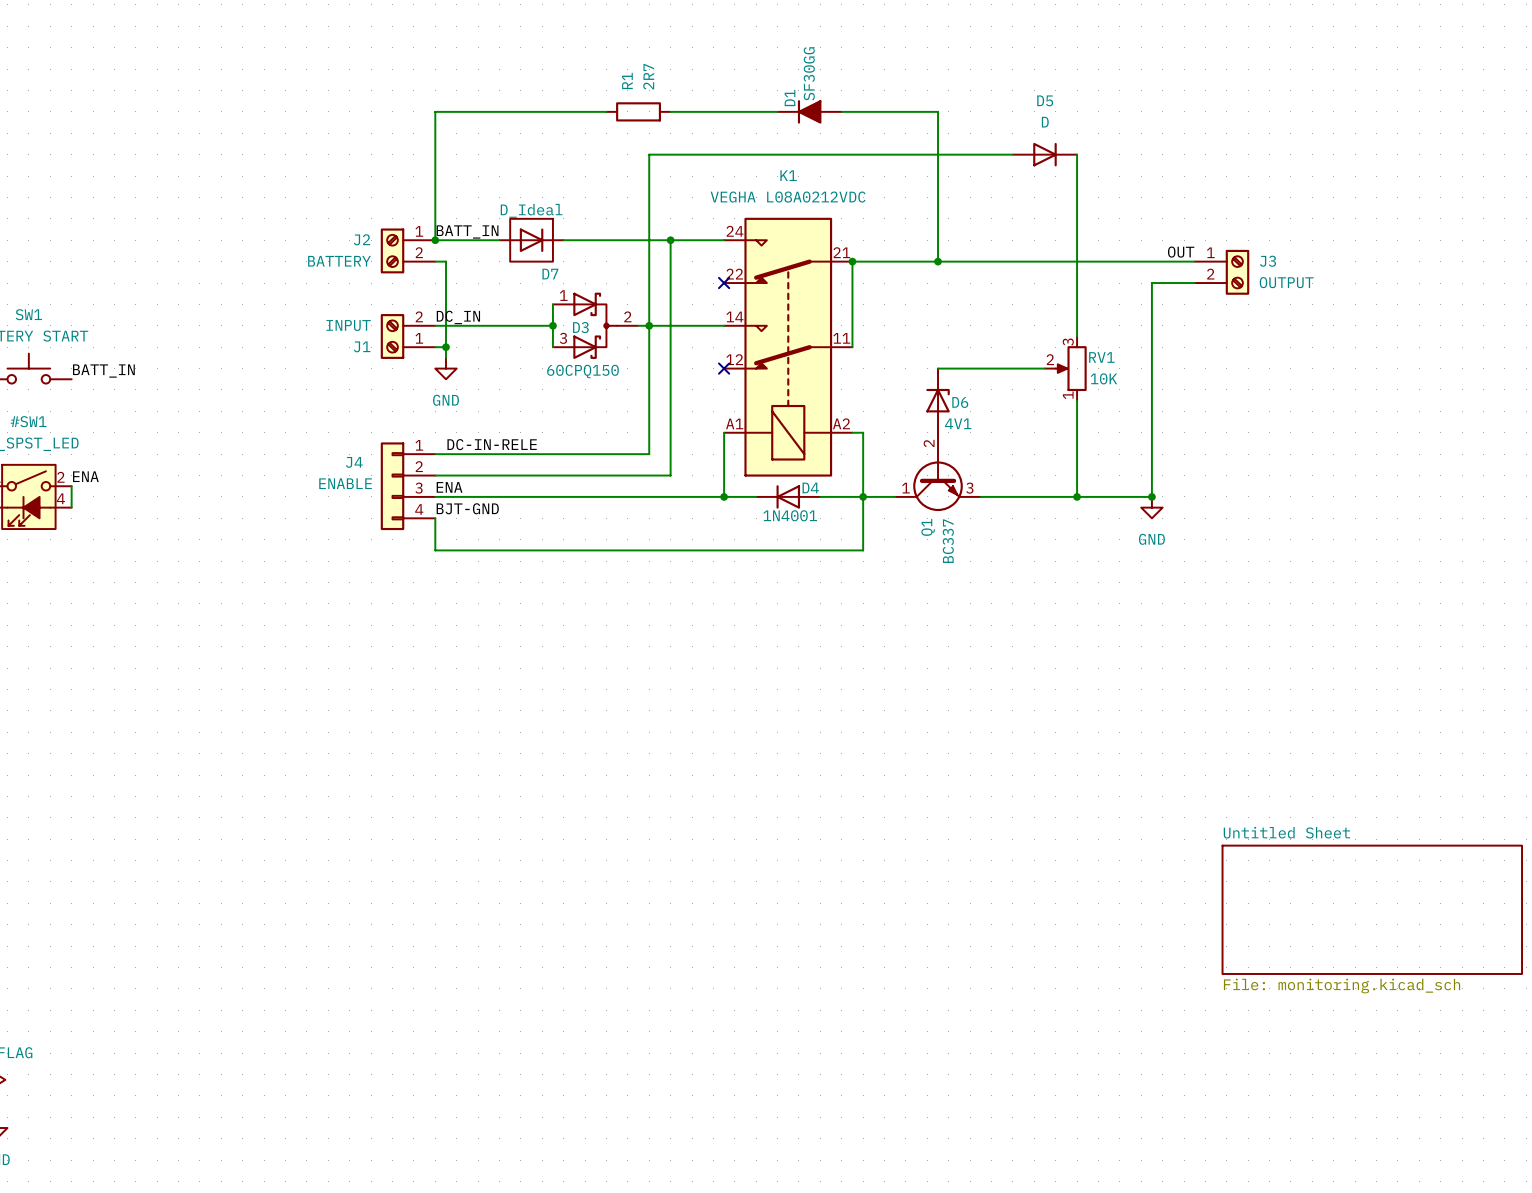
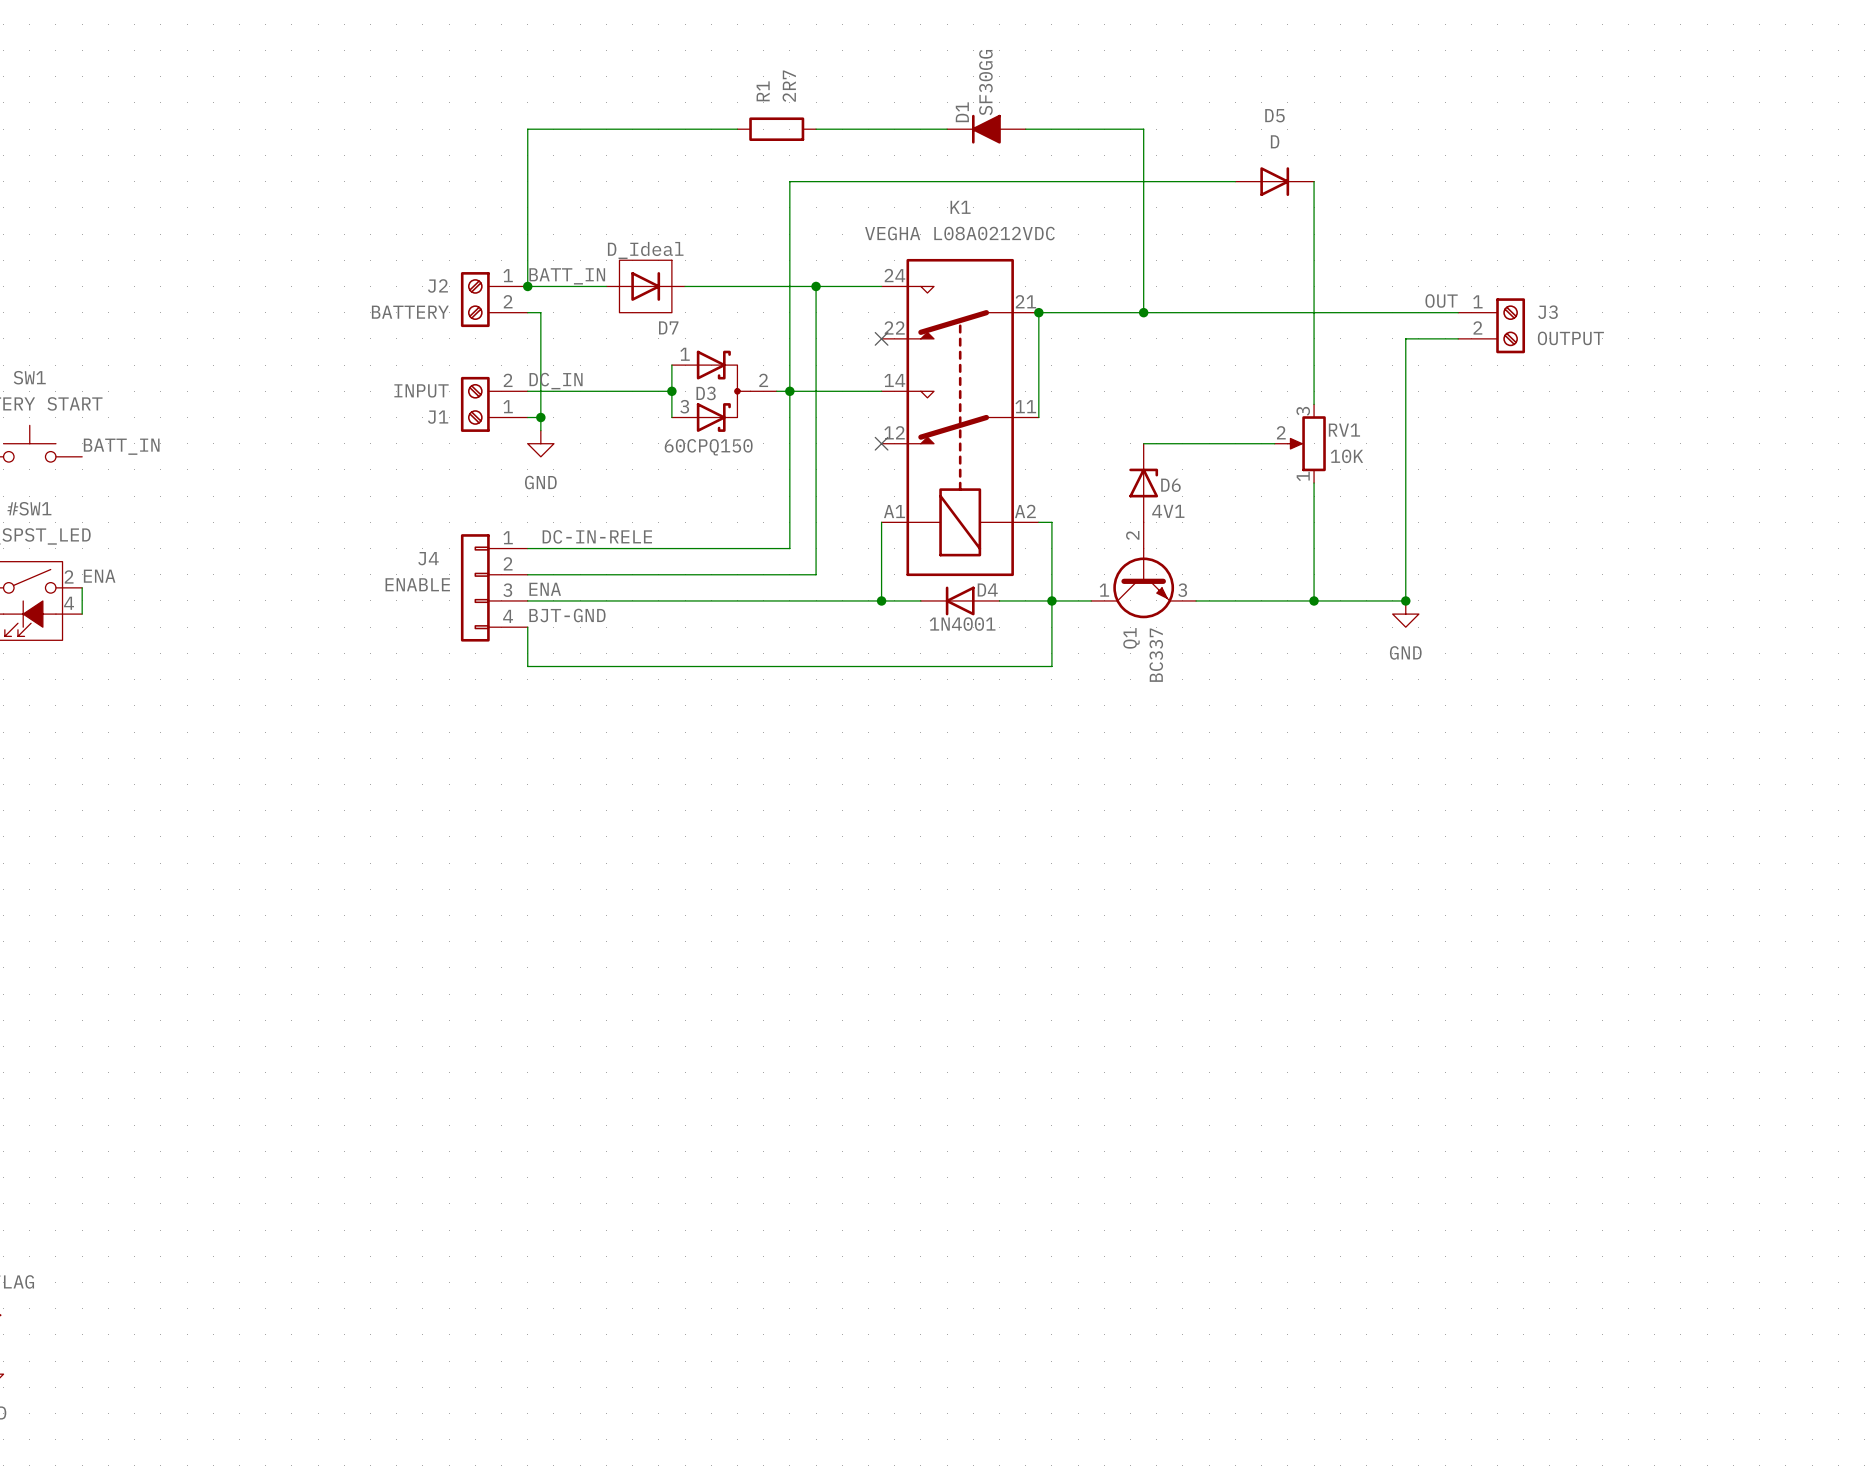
sheet Untitled Sheet: File: monitoring.kicad_sch (1372, 909) -> none

